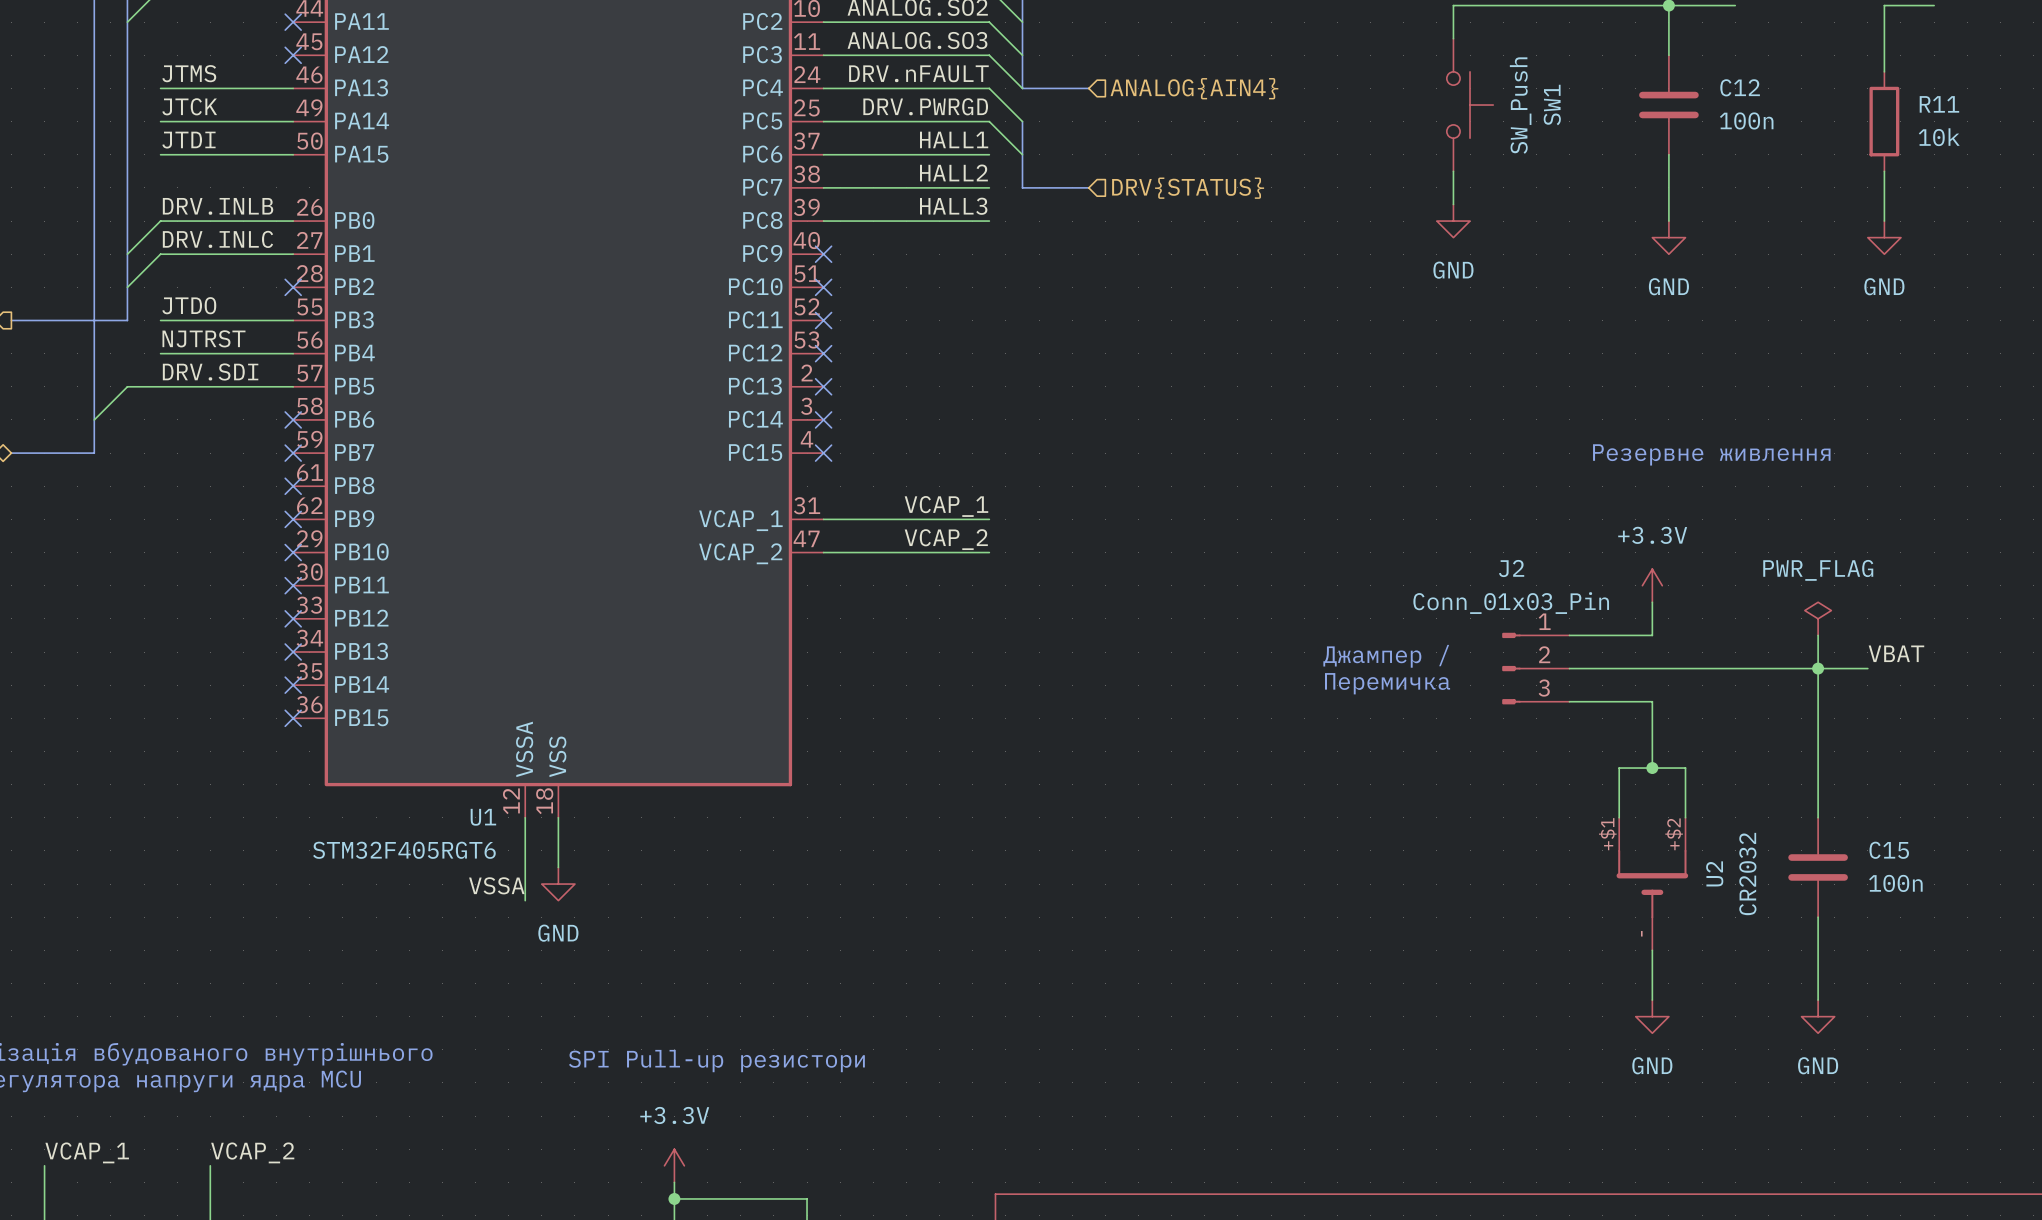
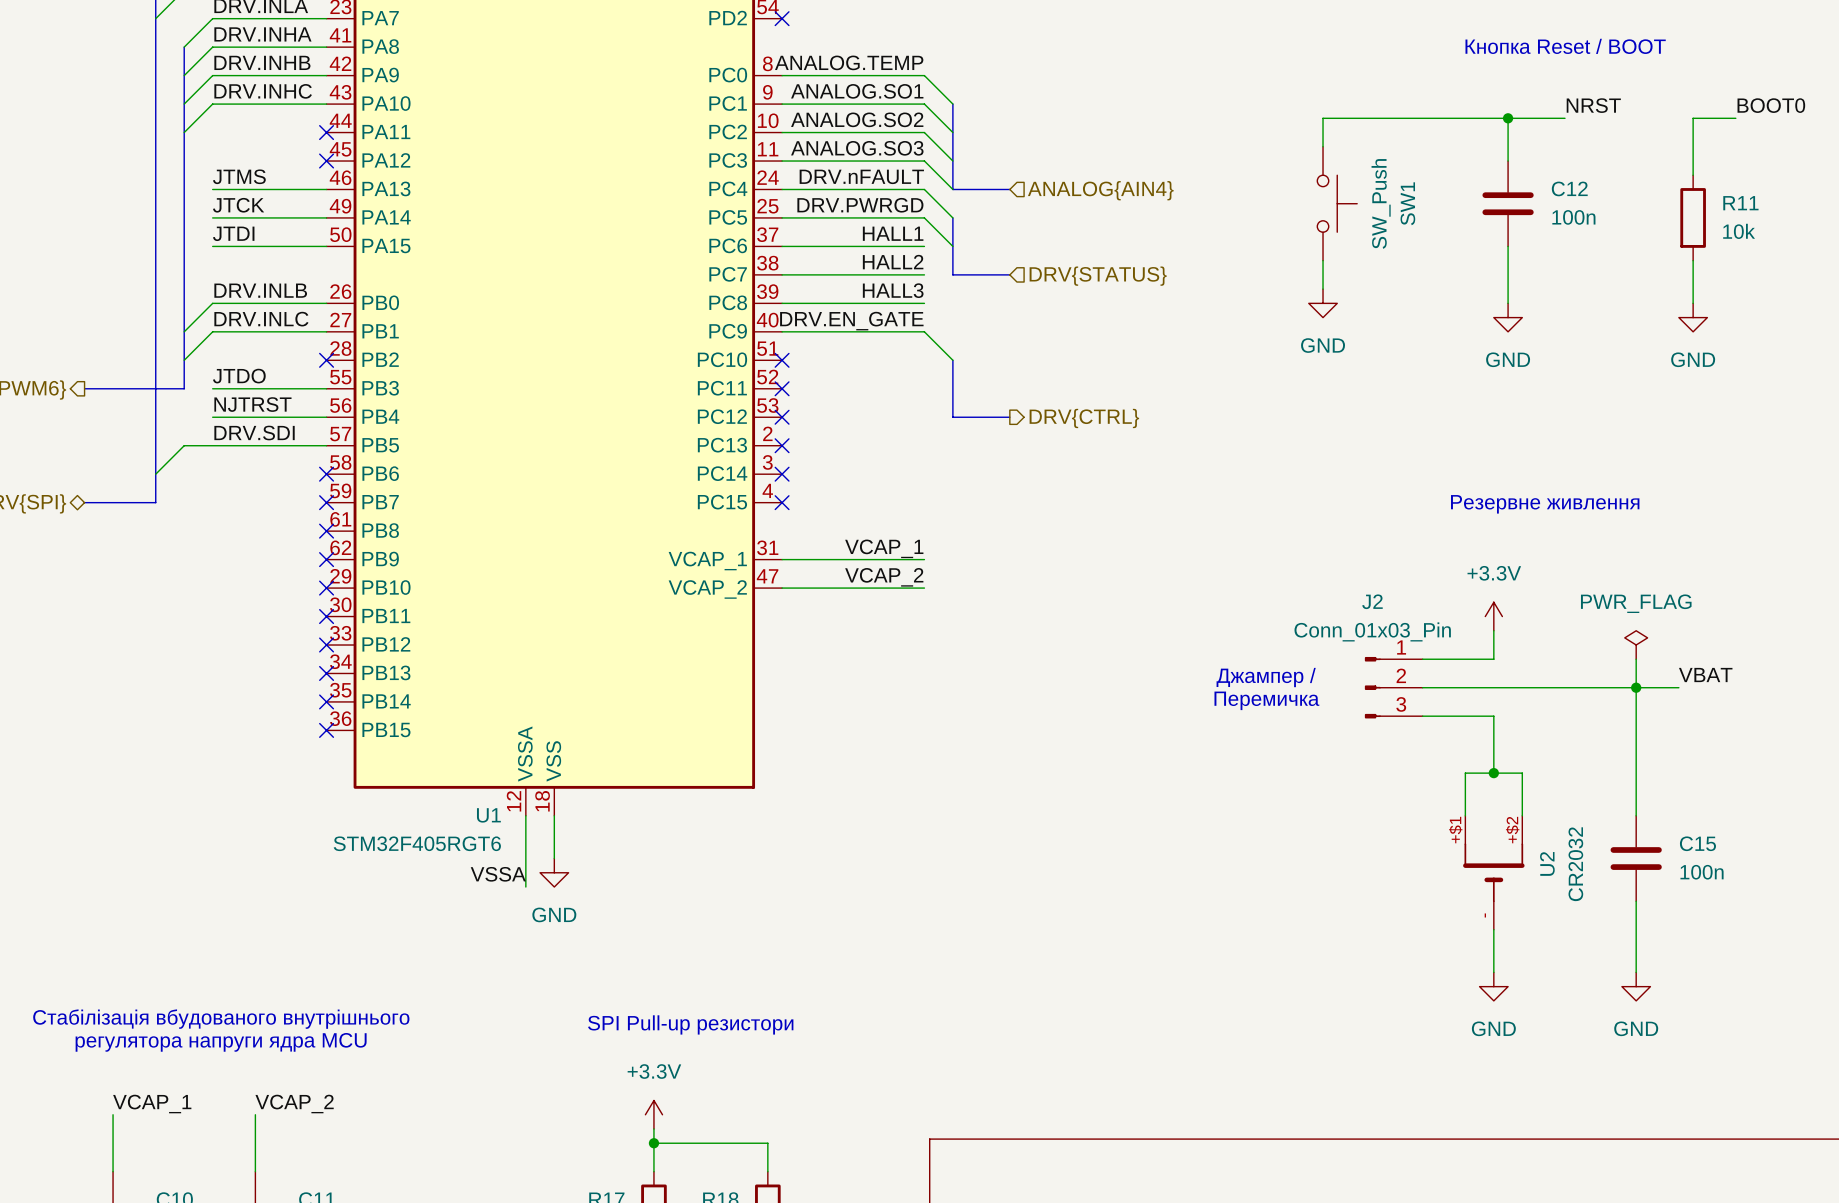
label: none -> DRV.EN_GATE (851, 321)
wire: none -> (782, 331) (924, 331) (952, 360)
no-connect mark: (823, 254) -> none
bus: none -> (952, 360) (952, 417) (1009, 417)
hierarchical label: none -> DRV{CTRL} (1084, 418)

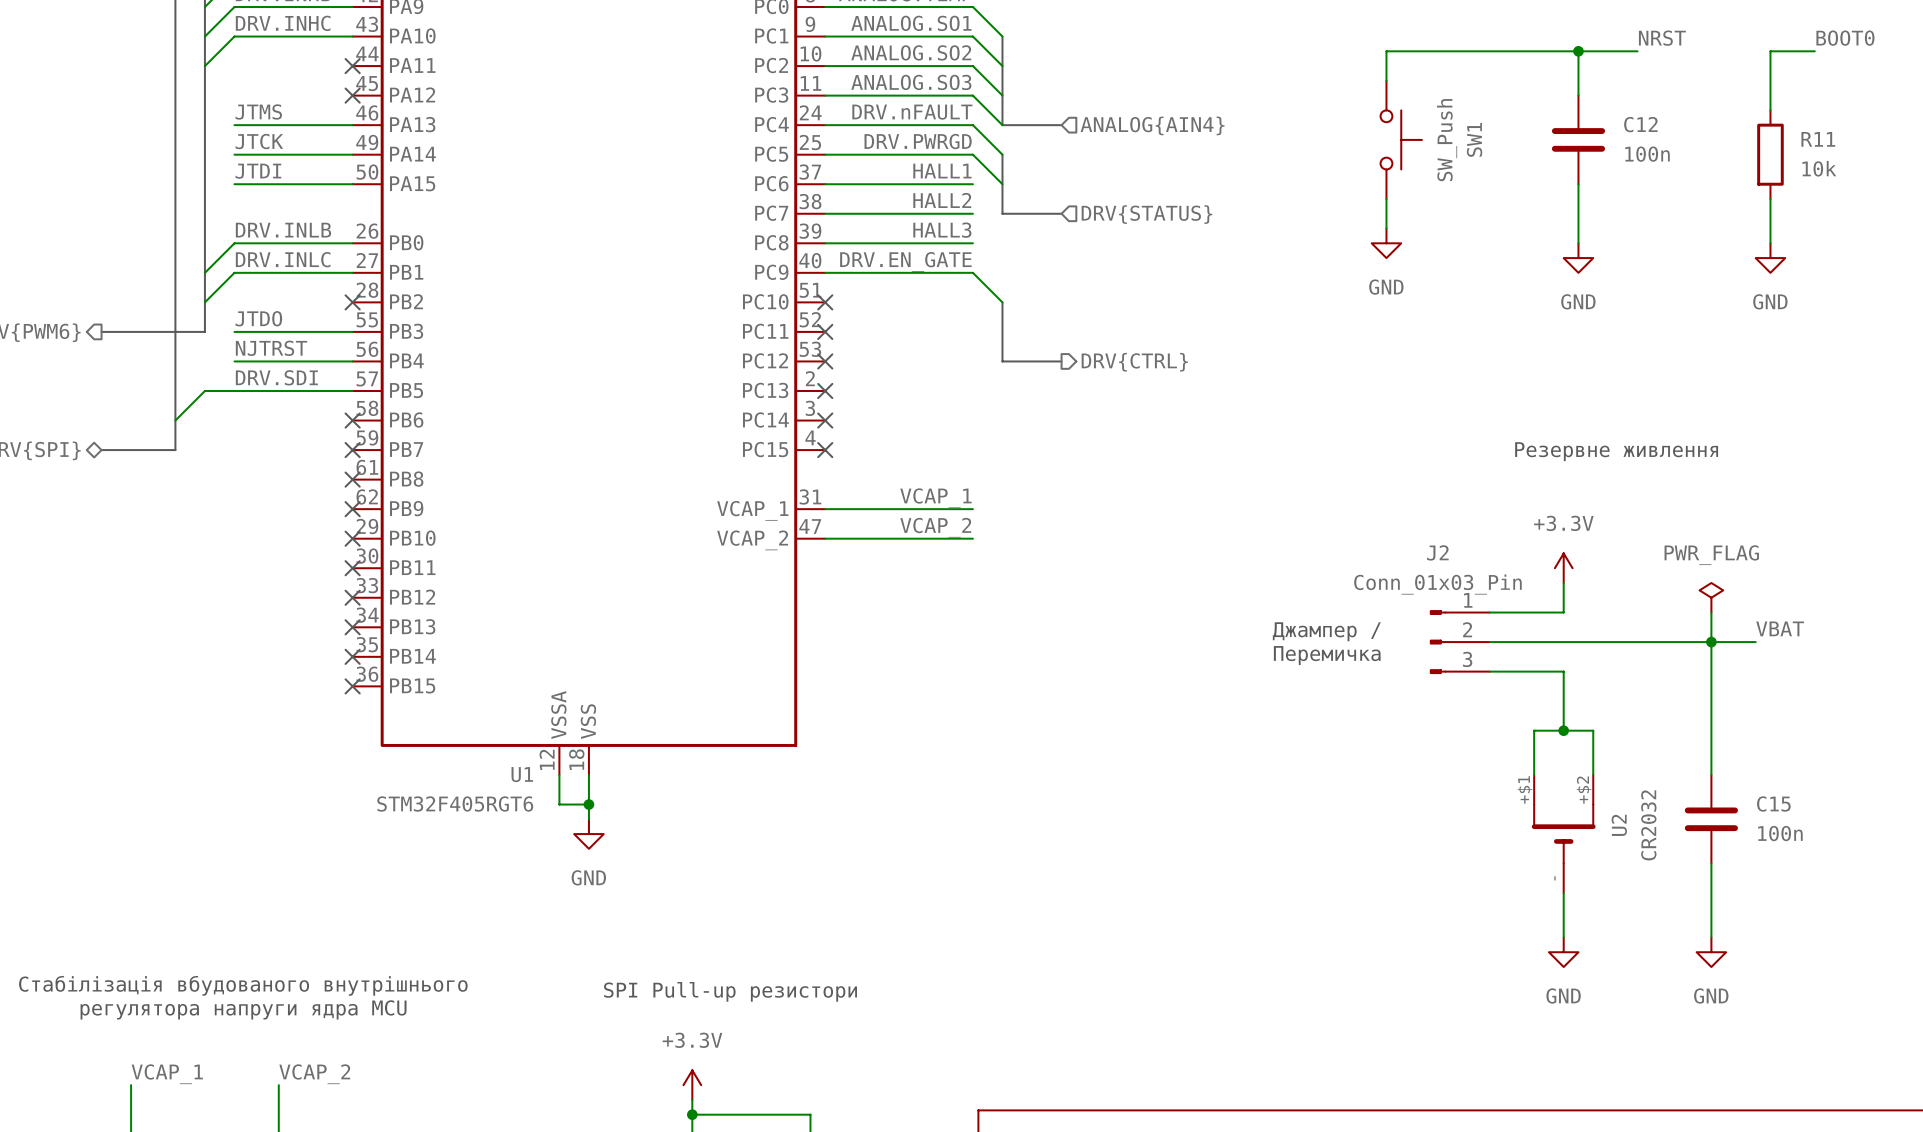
wire: (525, 844) (525, 887) -> (559, 804) (588, 804)
junction: none -> (588, 804)
label: VSSA (498, 874) -> none

